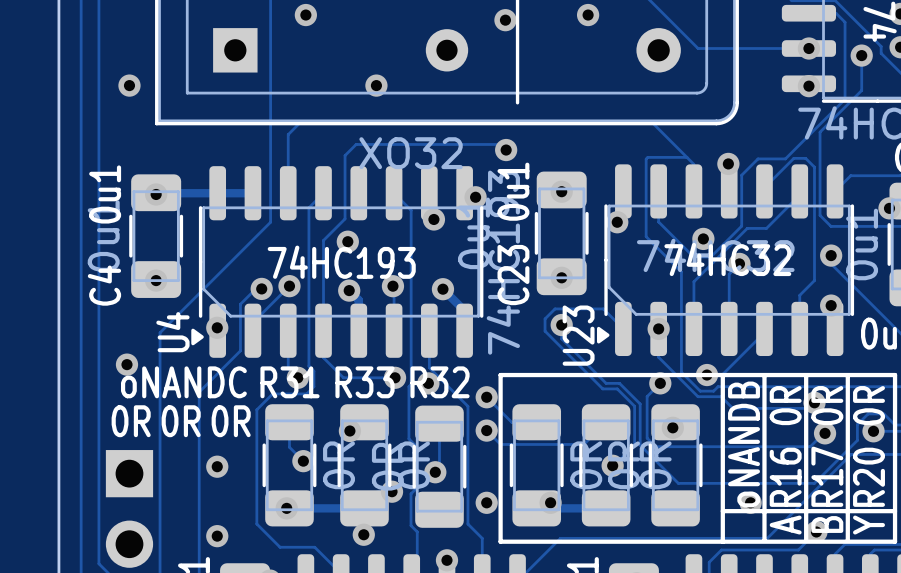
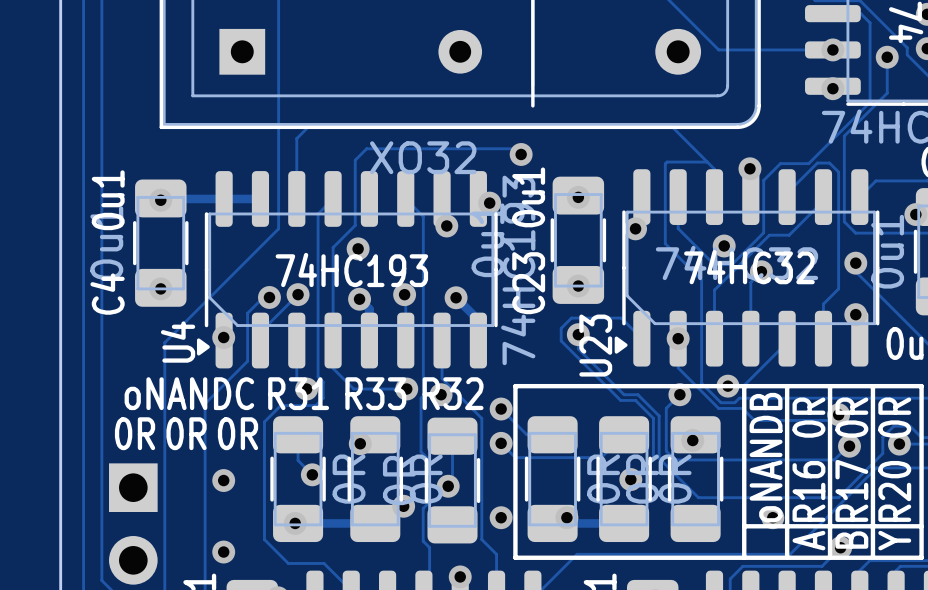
via: (305, 15) -> none
via: (588, 15) -> none
via: (505, 20) -> none
via: (129, 85) -> none
via: (376, 85) -> none
via: (126, 364) -> none
via: (363, 534) -> none

